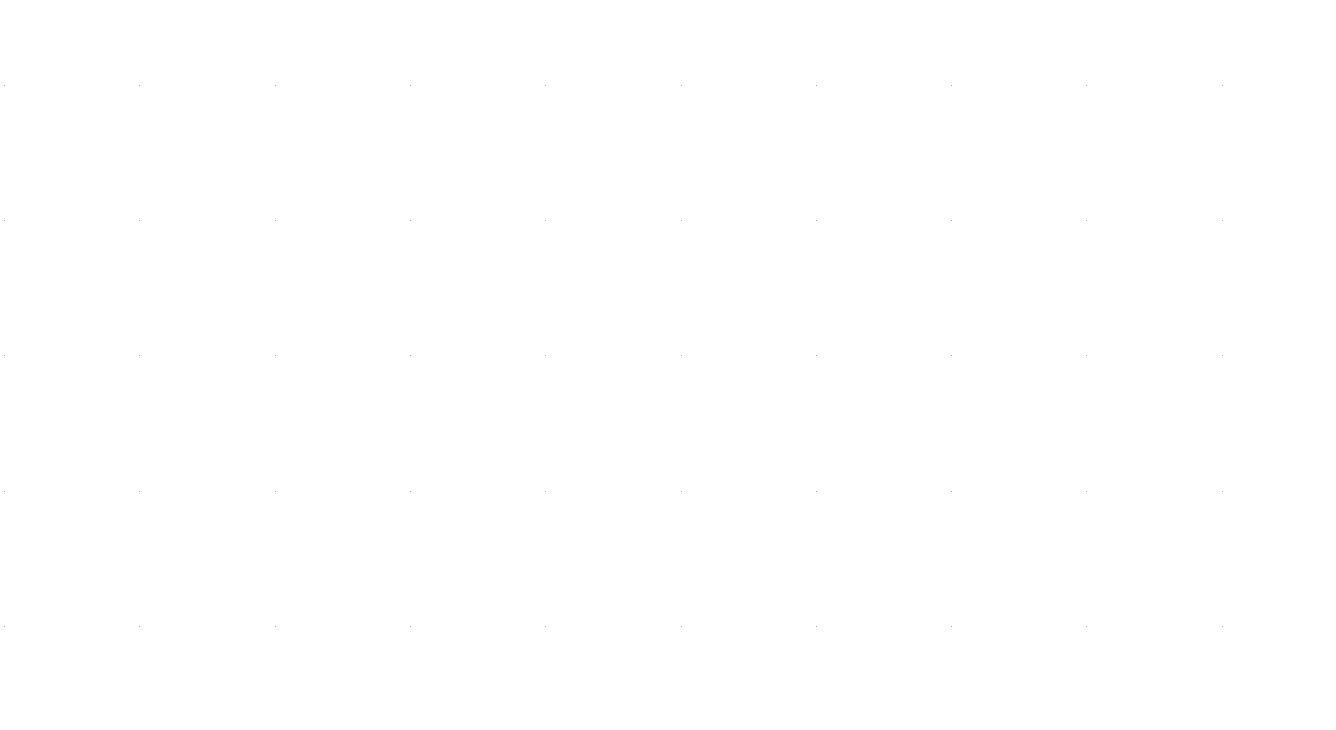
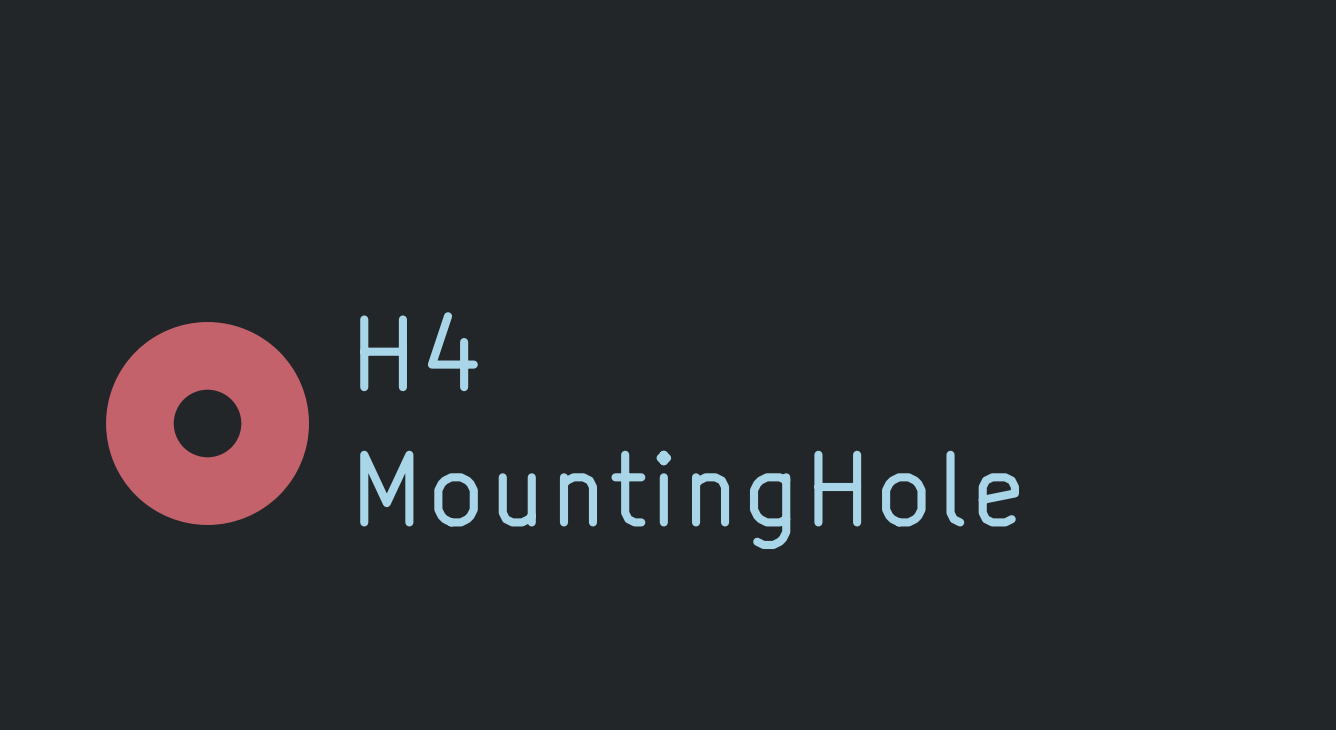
H4: none -> MountingHole (207, 423)

